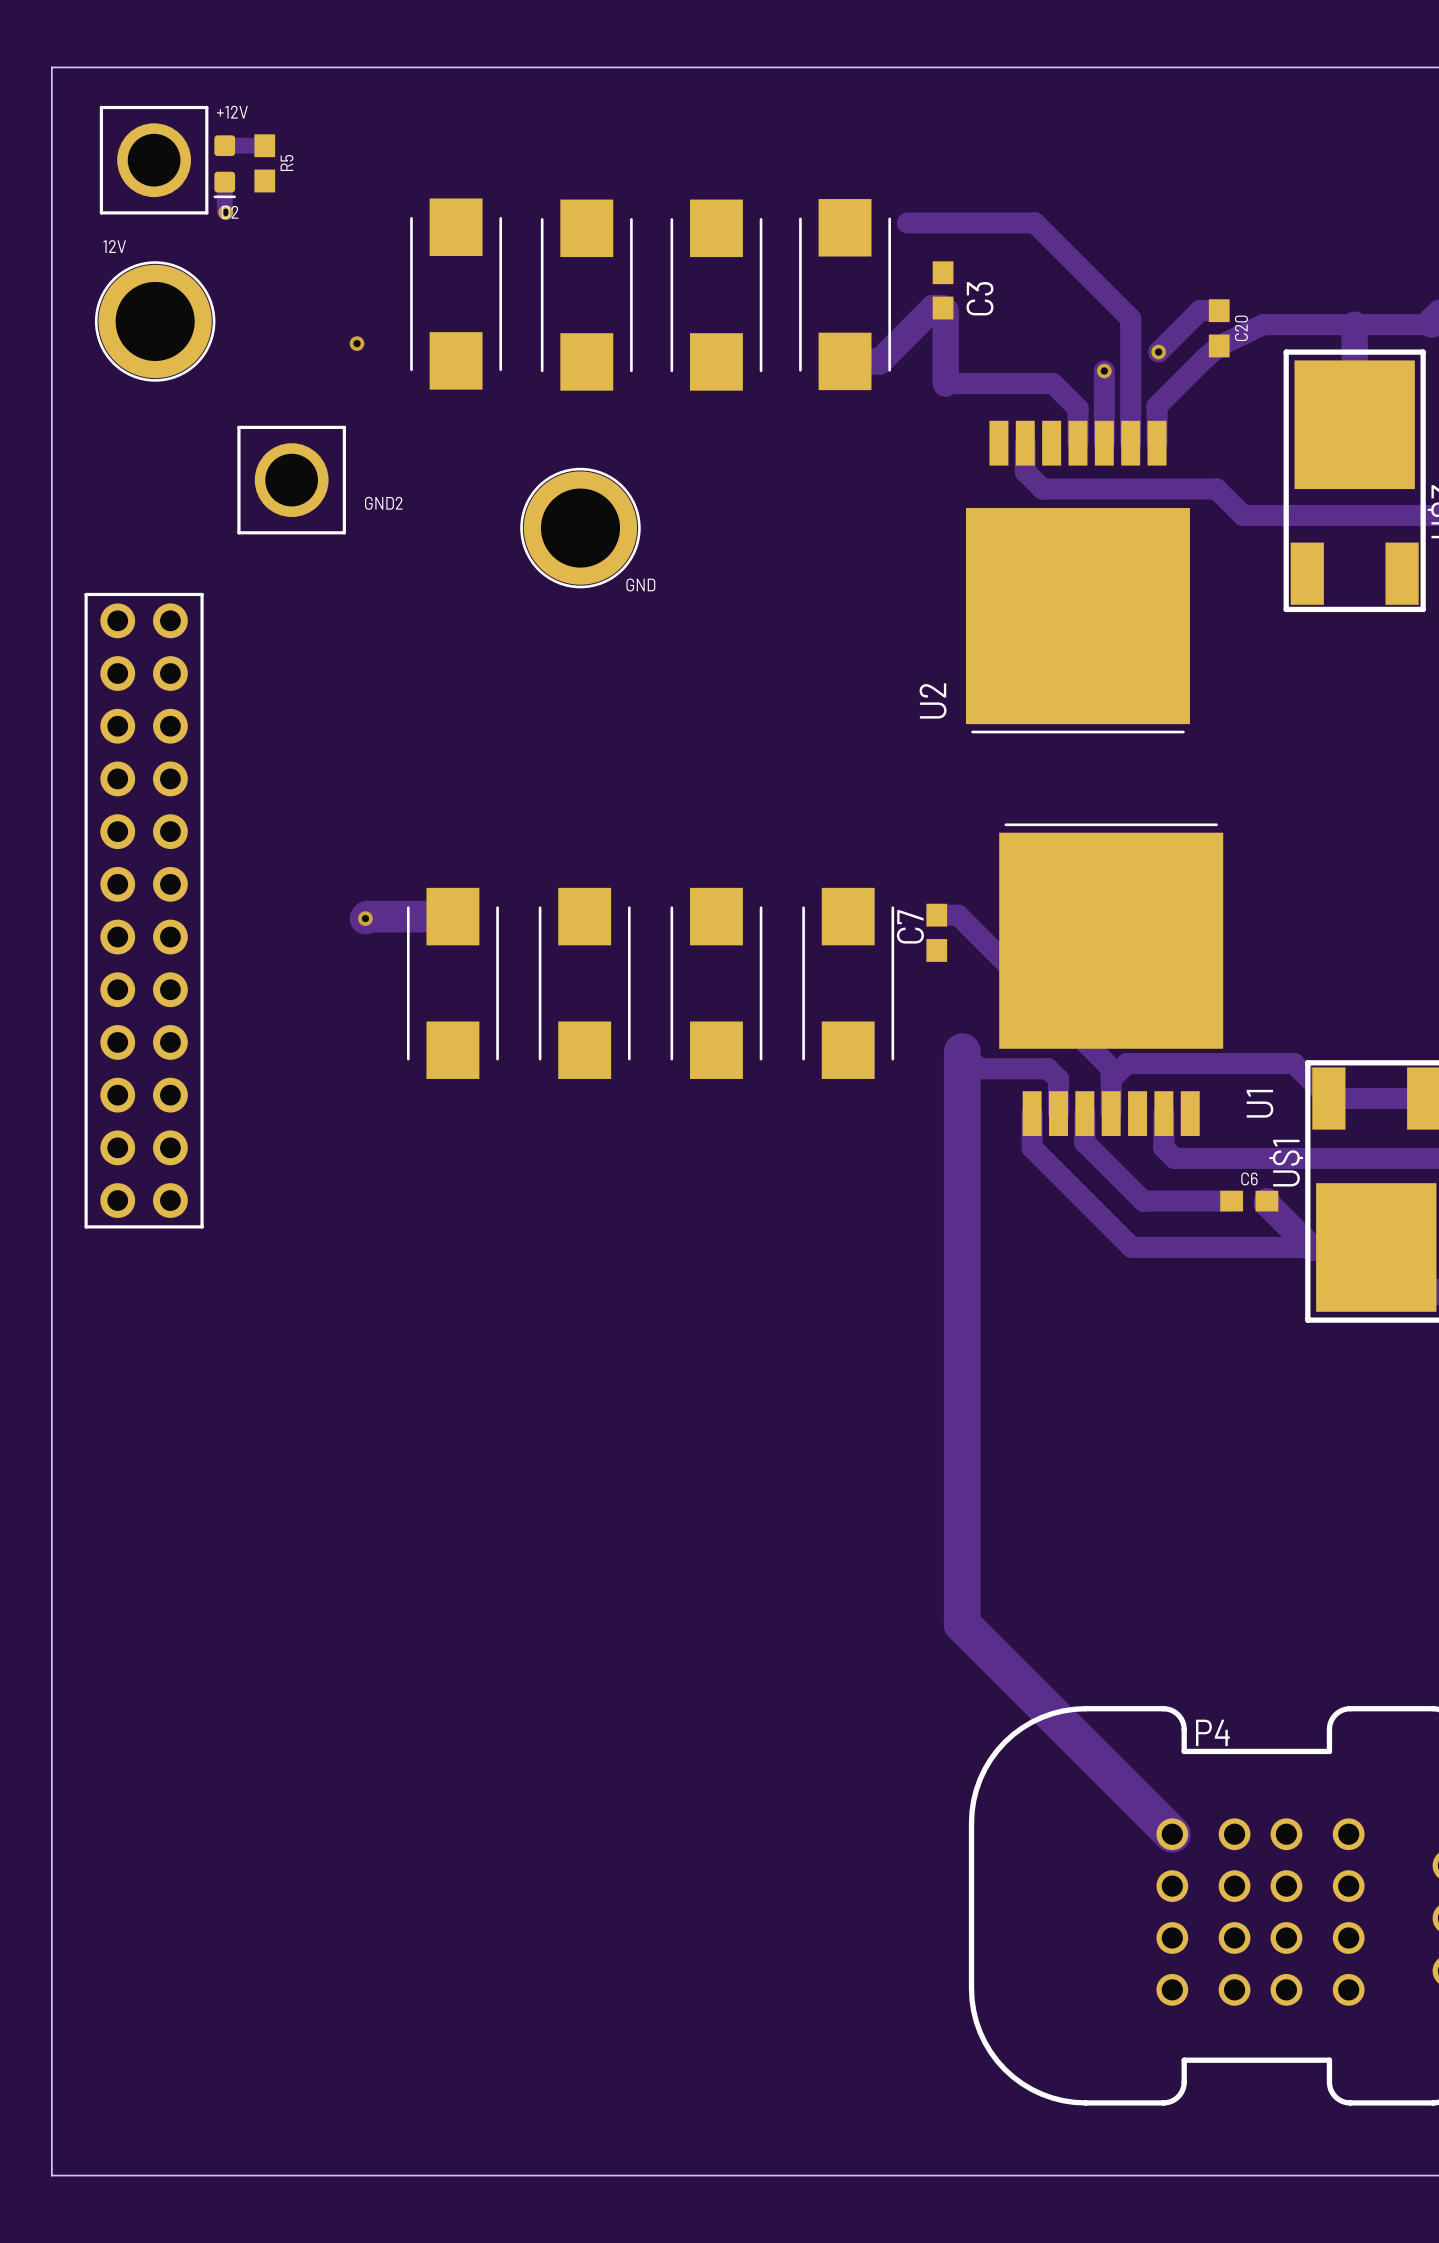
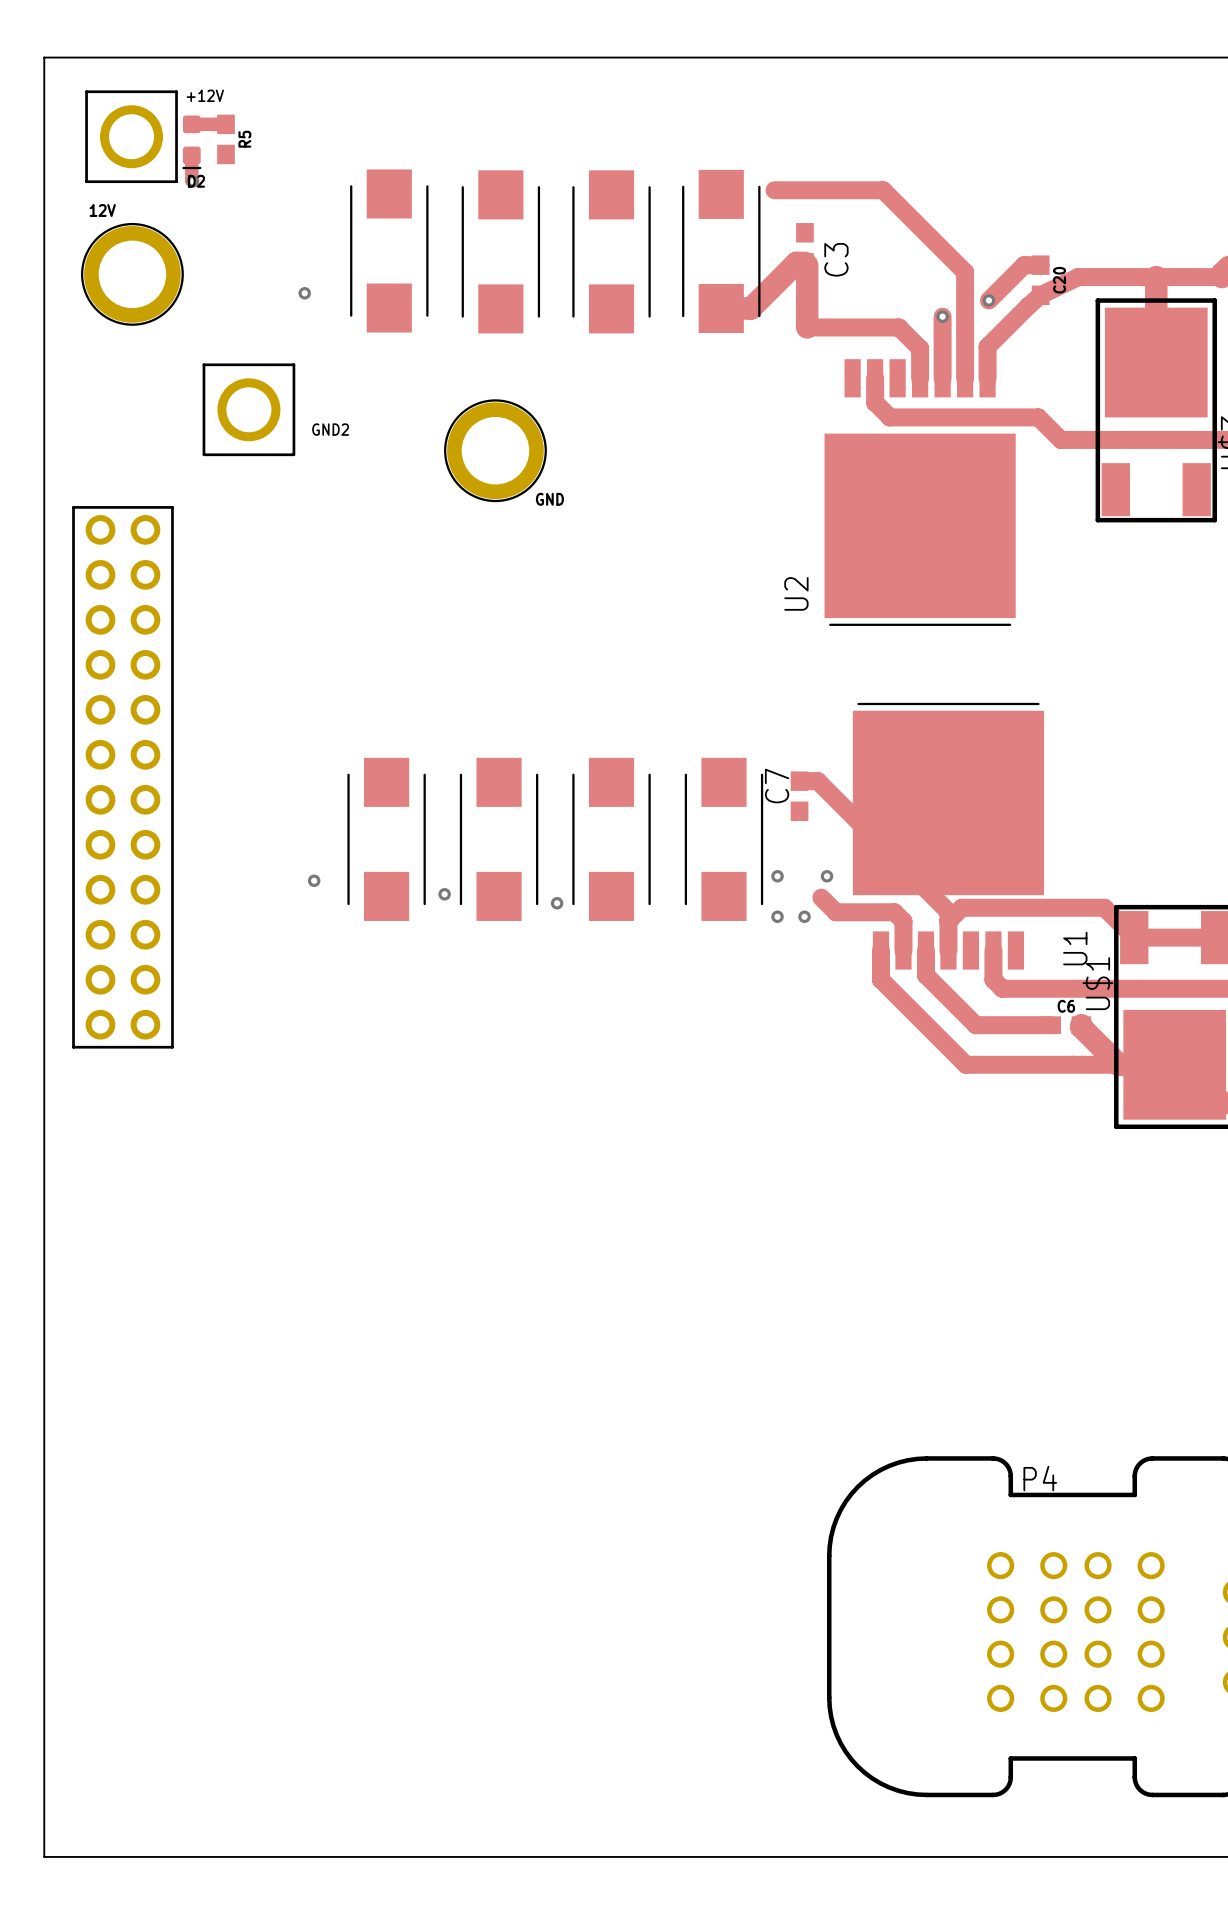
track: (452, 916) (367, 916) (365, 918) -> none
via: (365, 918) -> none
via: none -> (777, 876)
via: none -> (827, 876)
via: none -> (314, 880)
via: none -> (444, 894)
track: (962, 1051) (962, 1624) (1172, 1834) -> none
via: none -> (557, 903)
via: none -> (777, 916)
via: none -> (804, 916)

